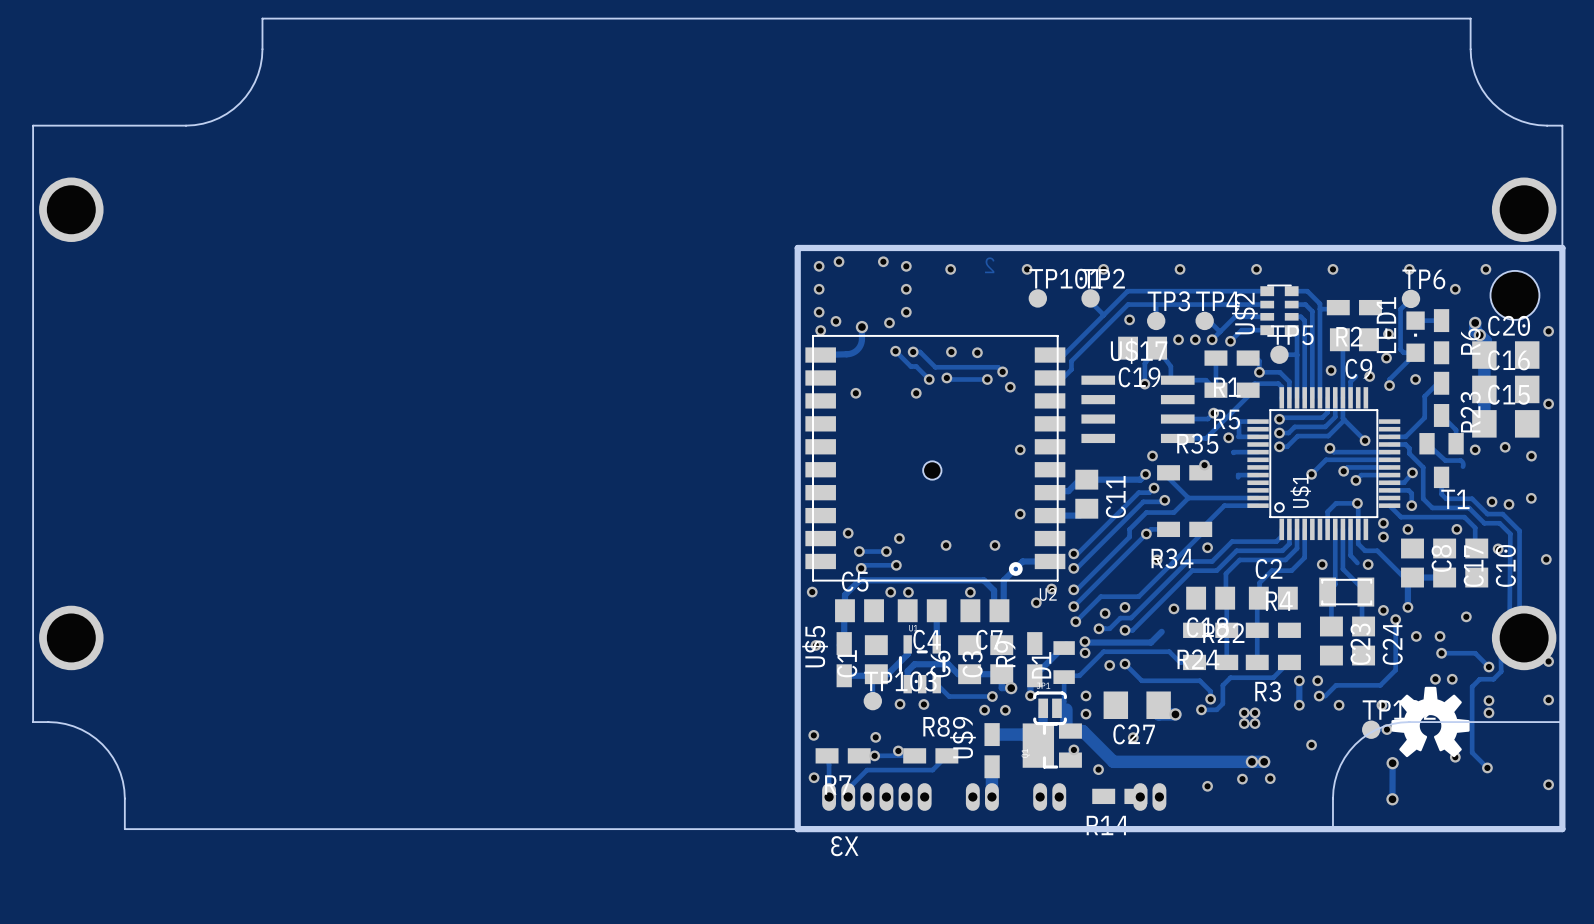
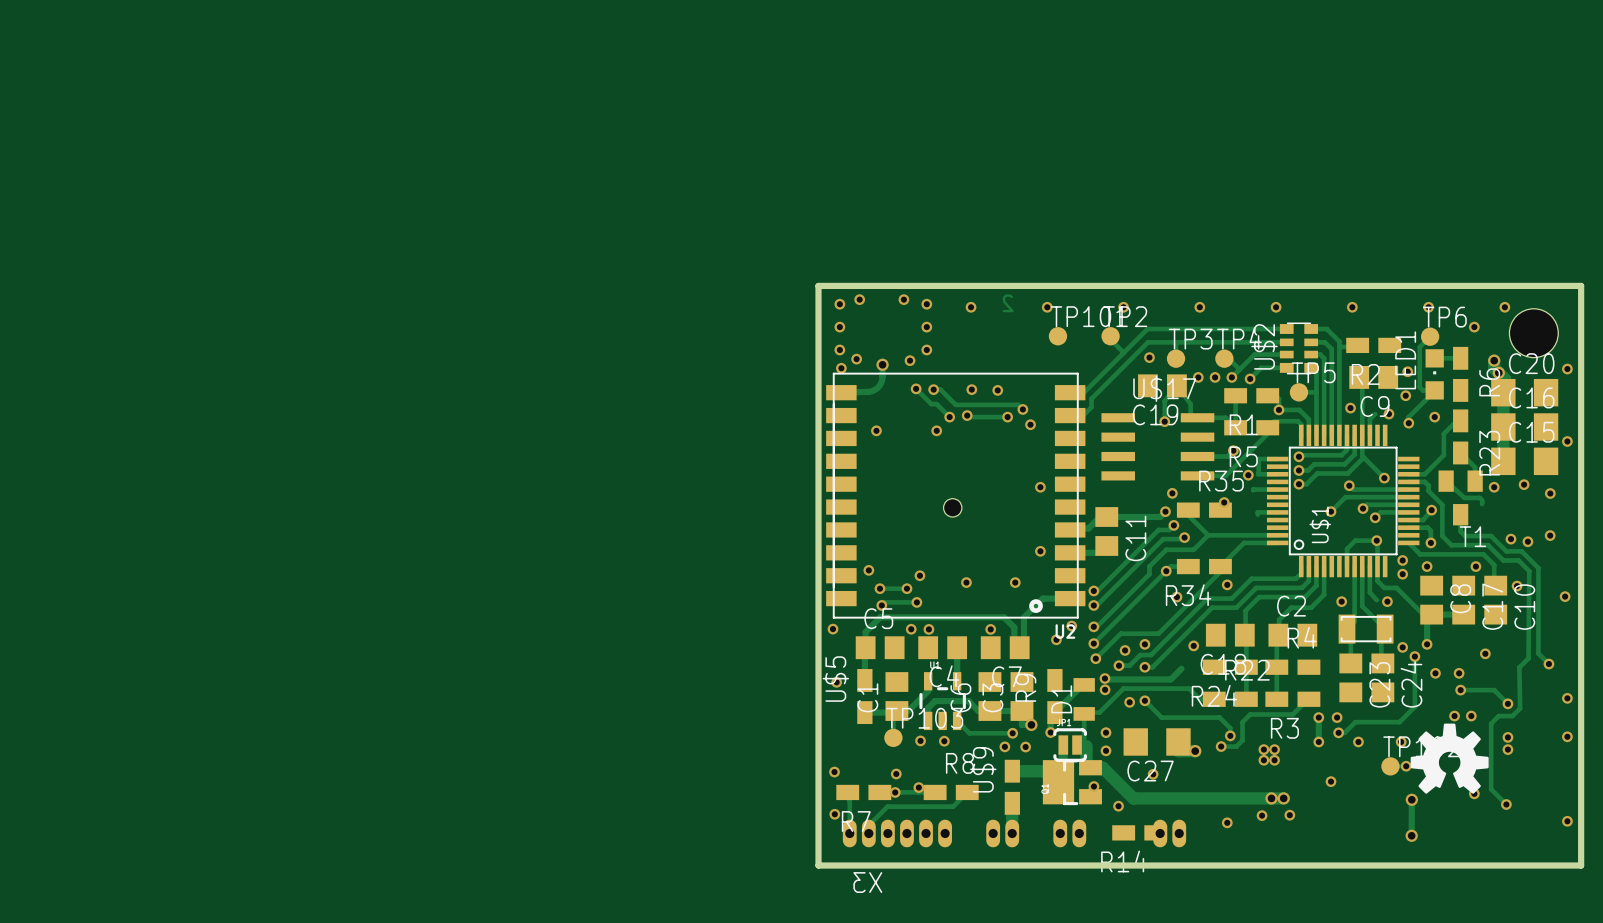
part: (797, 423) -> none

